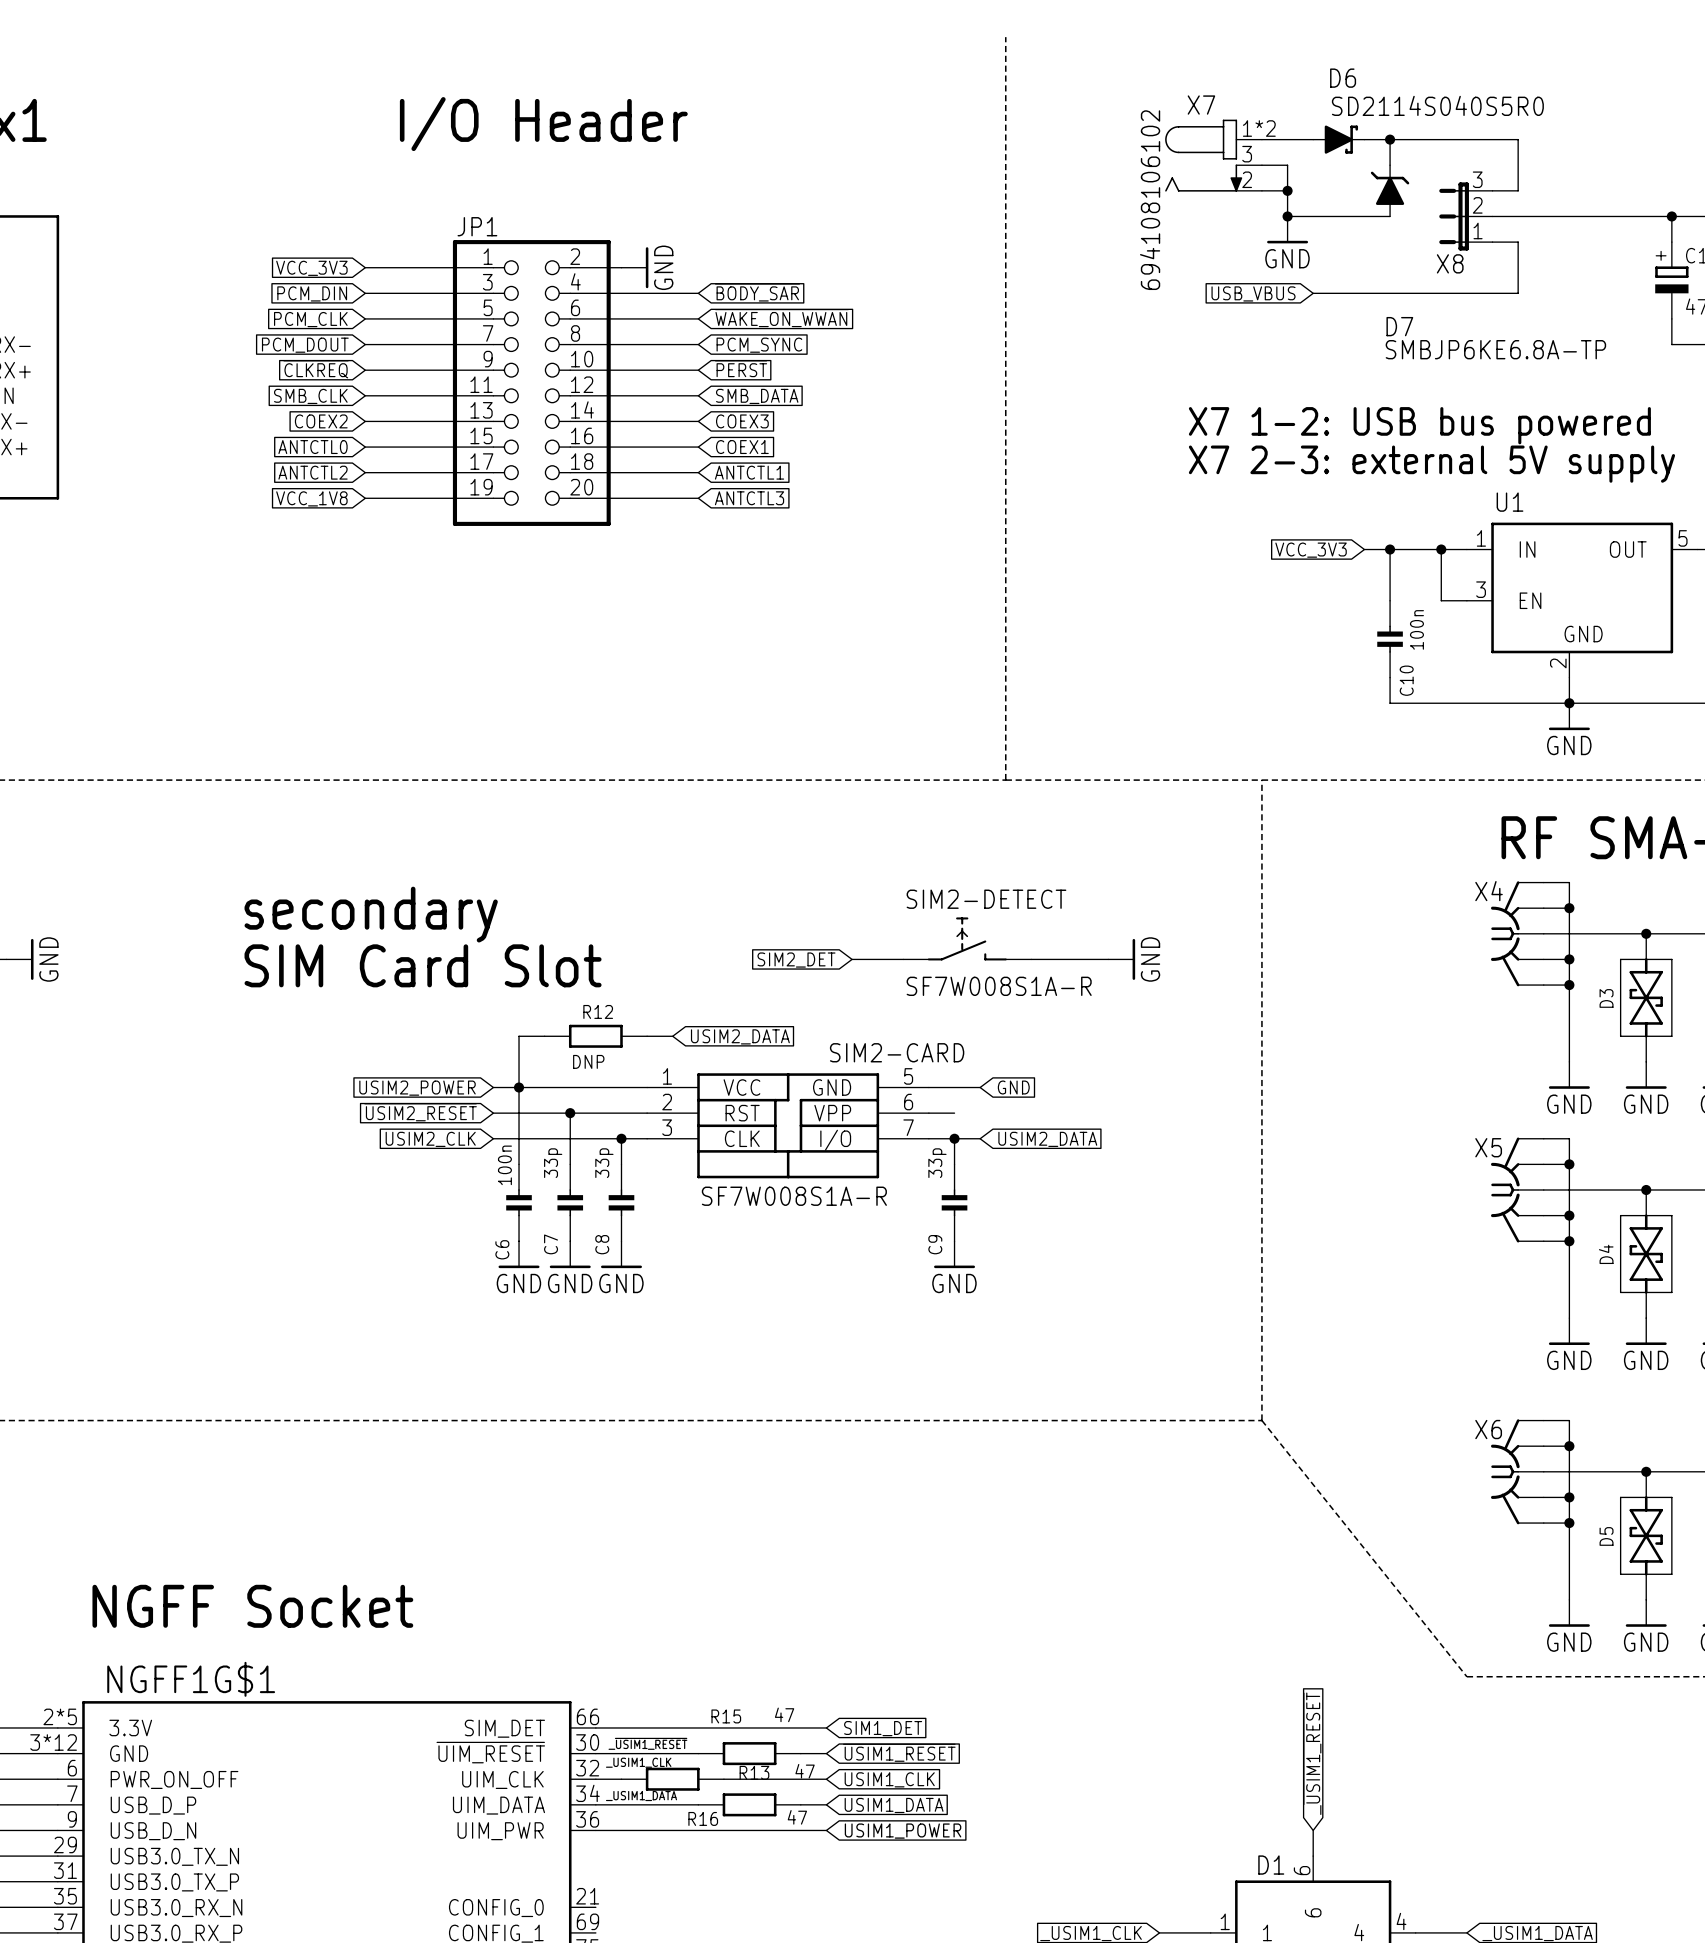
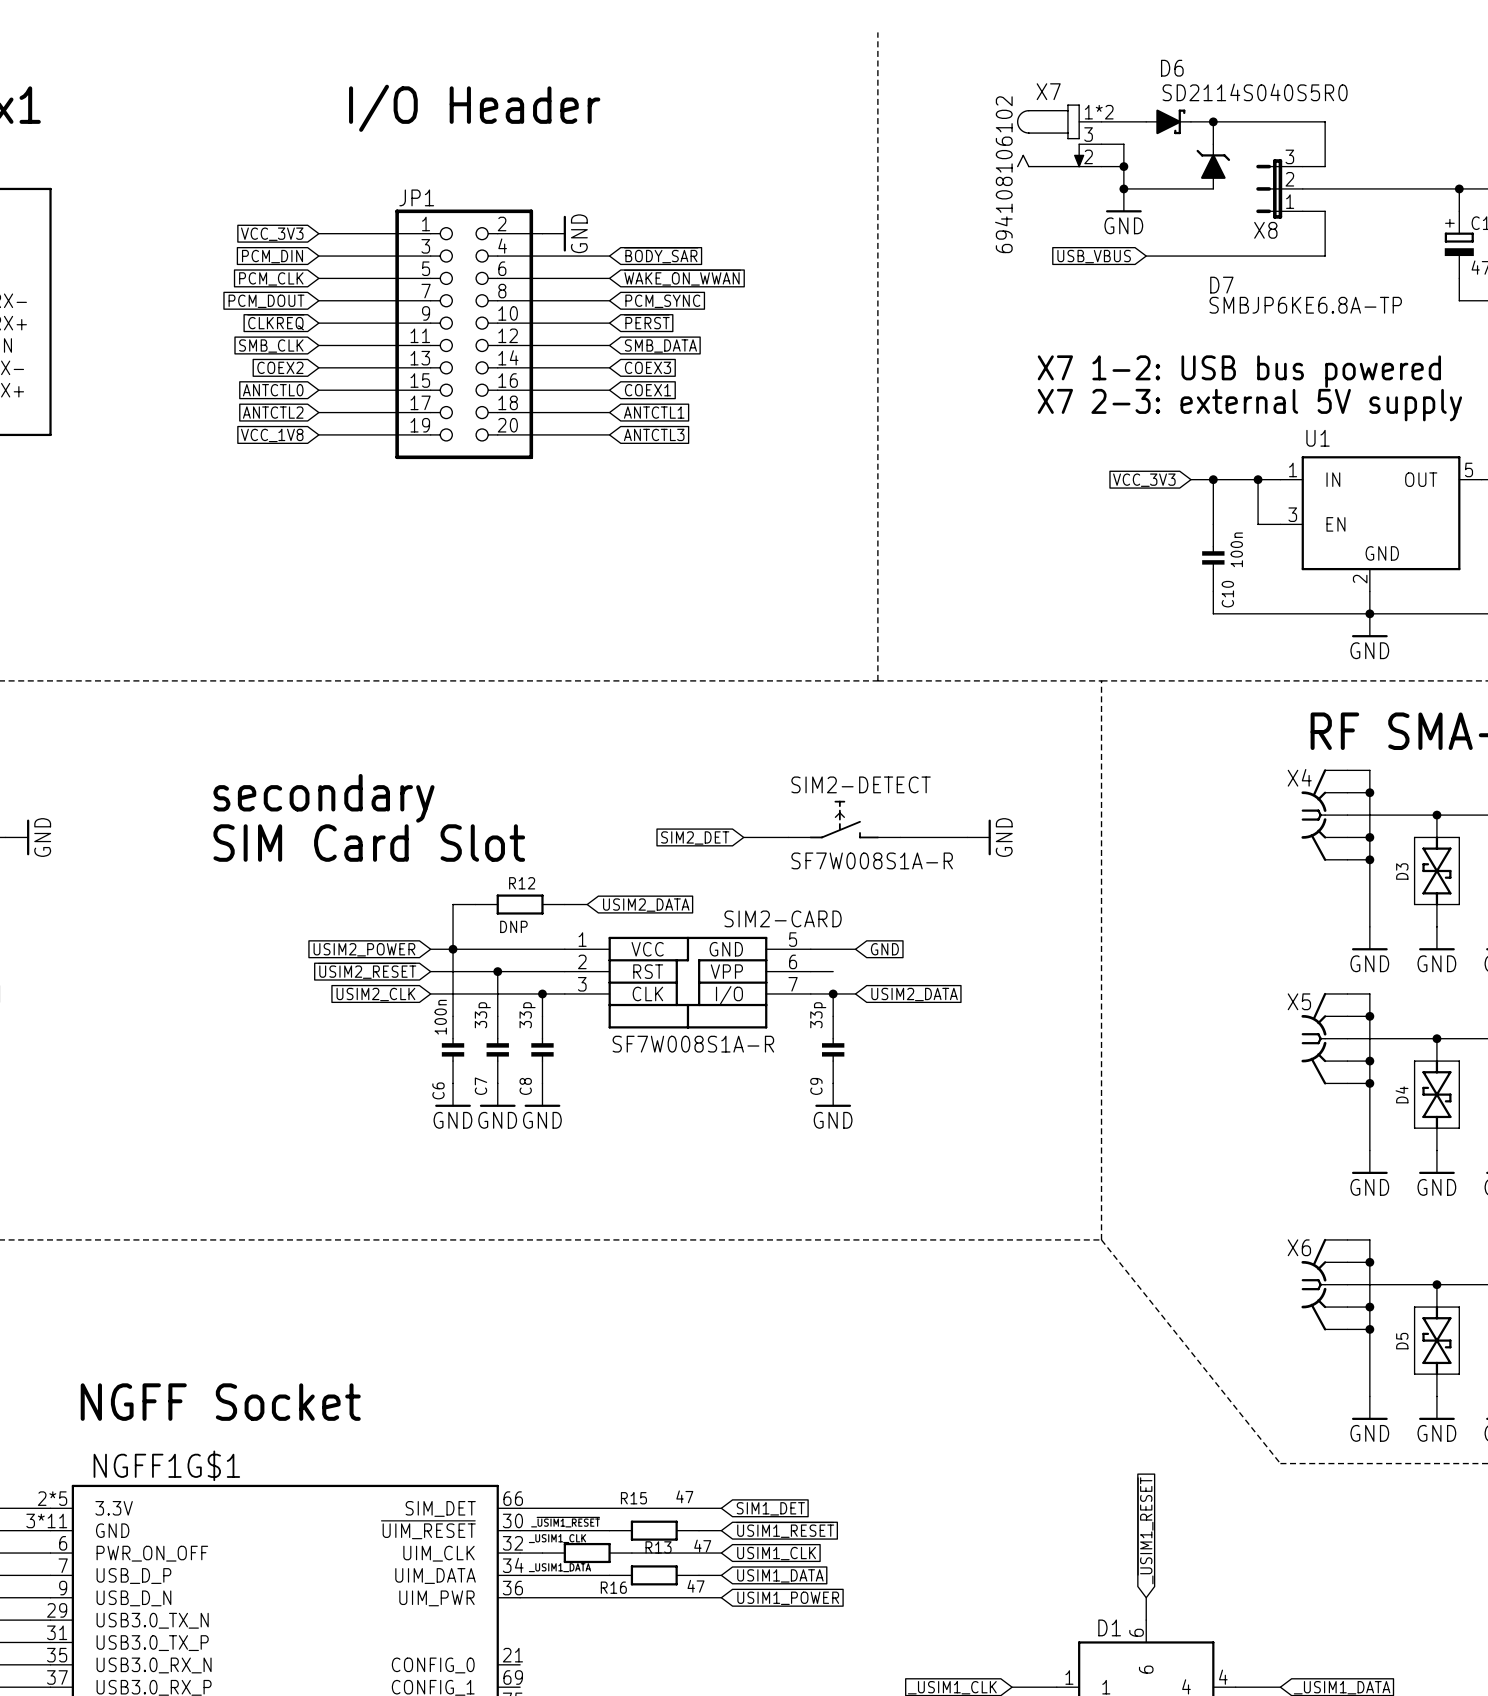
NGFF1G$1 pin number: 3*12 (53, 1742) -> 3*11 (46, 1520)

